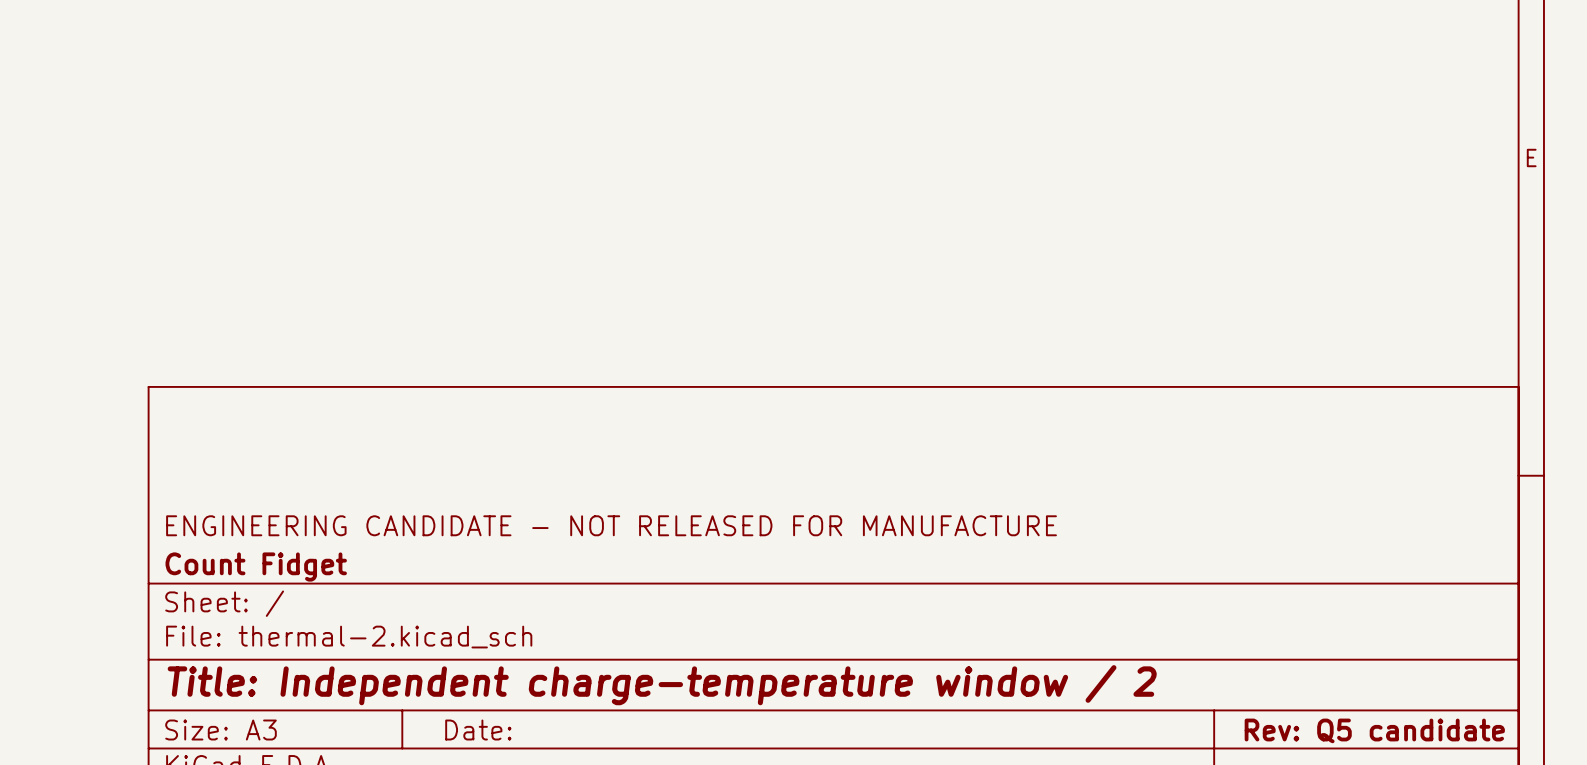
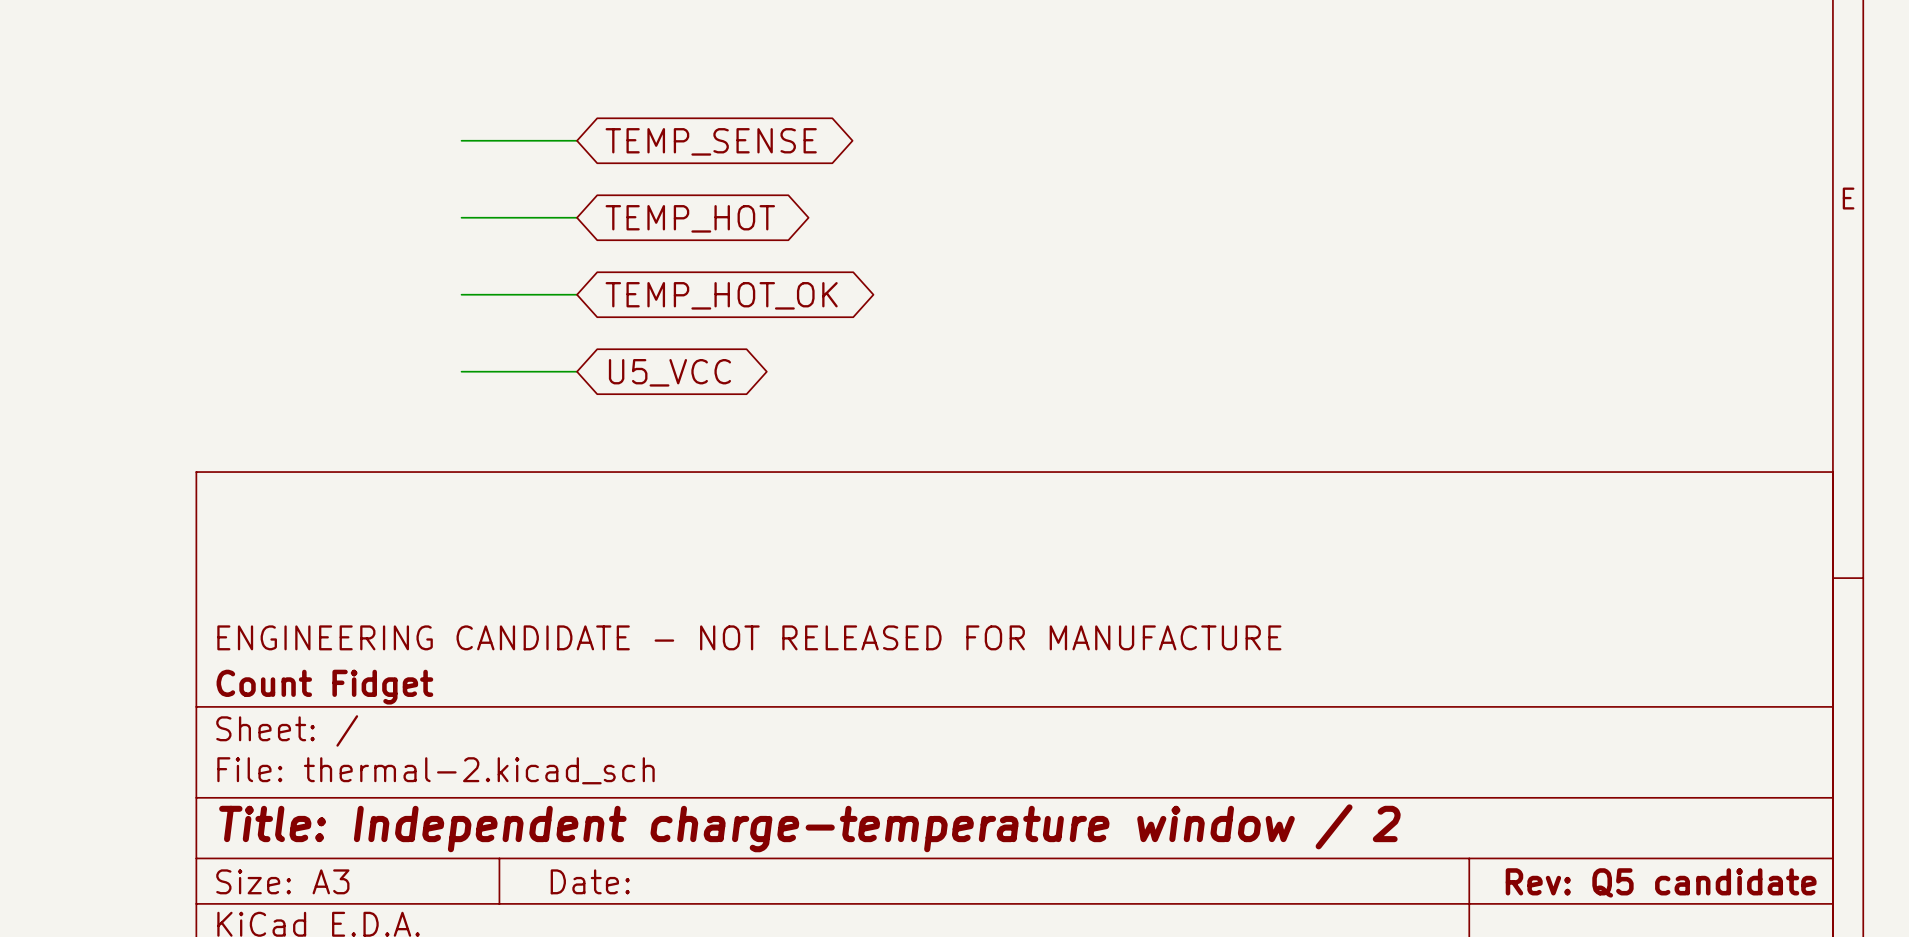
wire: none -> (461, 140) (577, 140)
global label: none -> TEMP_SENSE (711, 141)
wire: none -> (461, 217) (577, 217)
global label: none -> TEMP_HOT (690, 218)
wire: none -> (461, 294) (577, 294)
global label: none -> TEMP_HOT_OK (721, 295)
wire: none -> (461, 371) (577, 371)
global label: none -> U5_VCC (669, 372)

